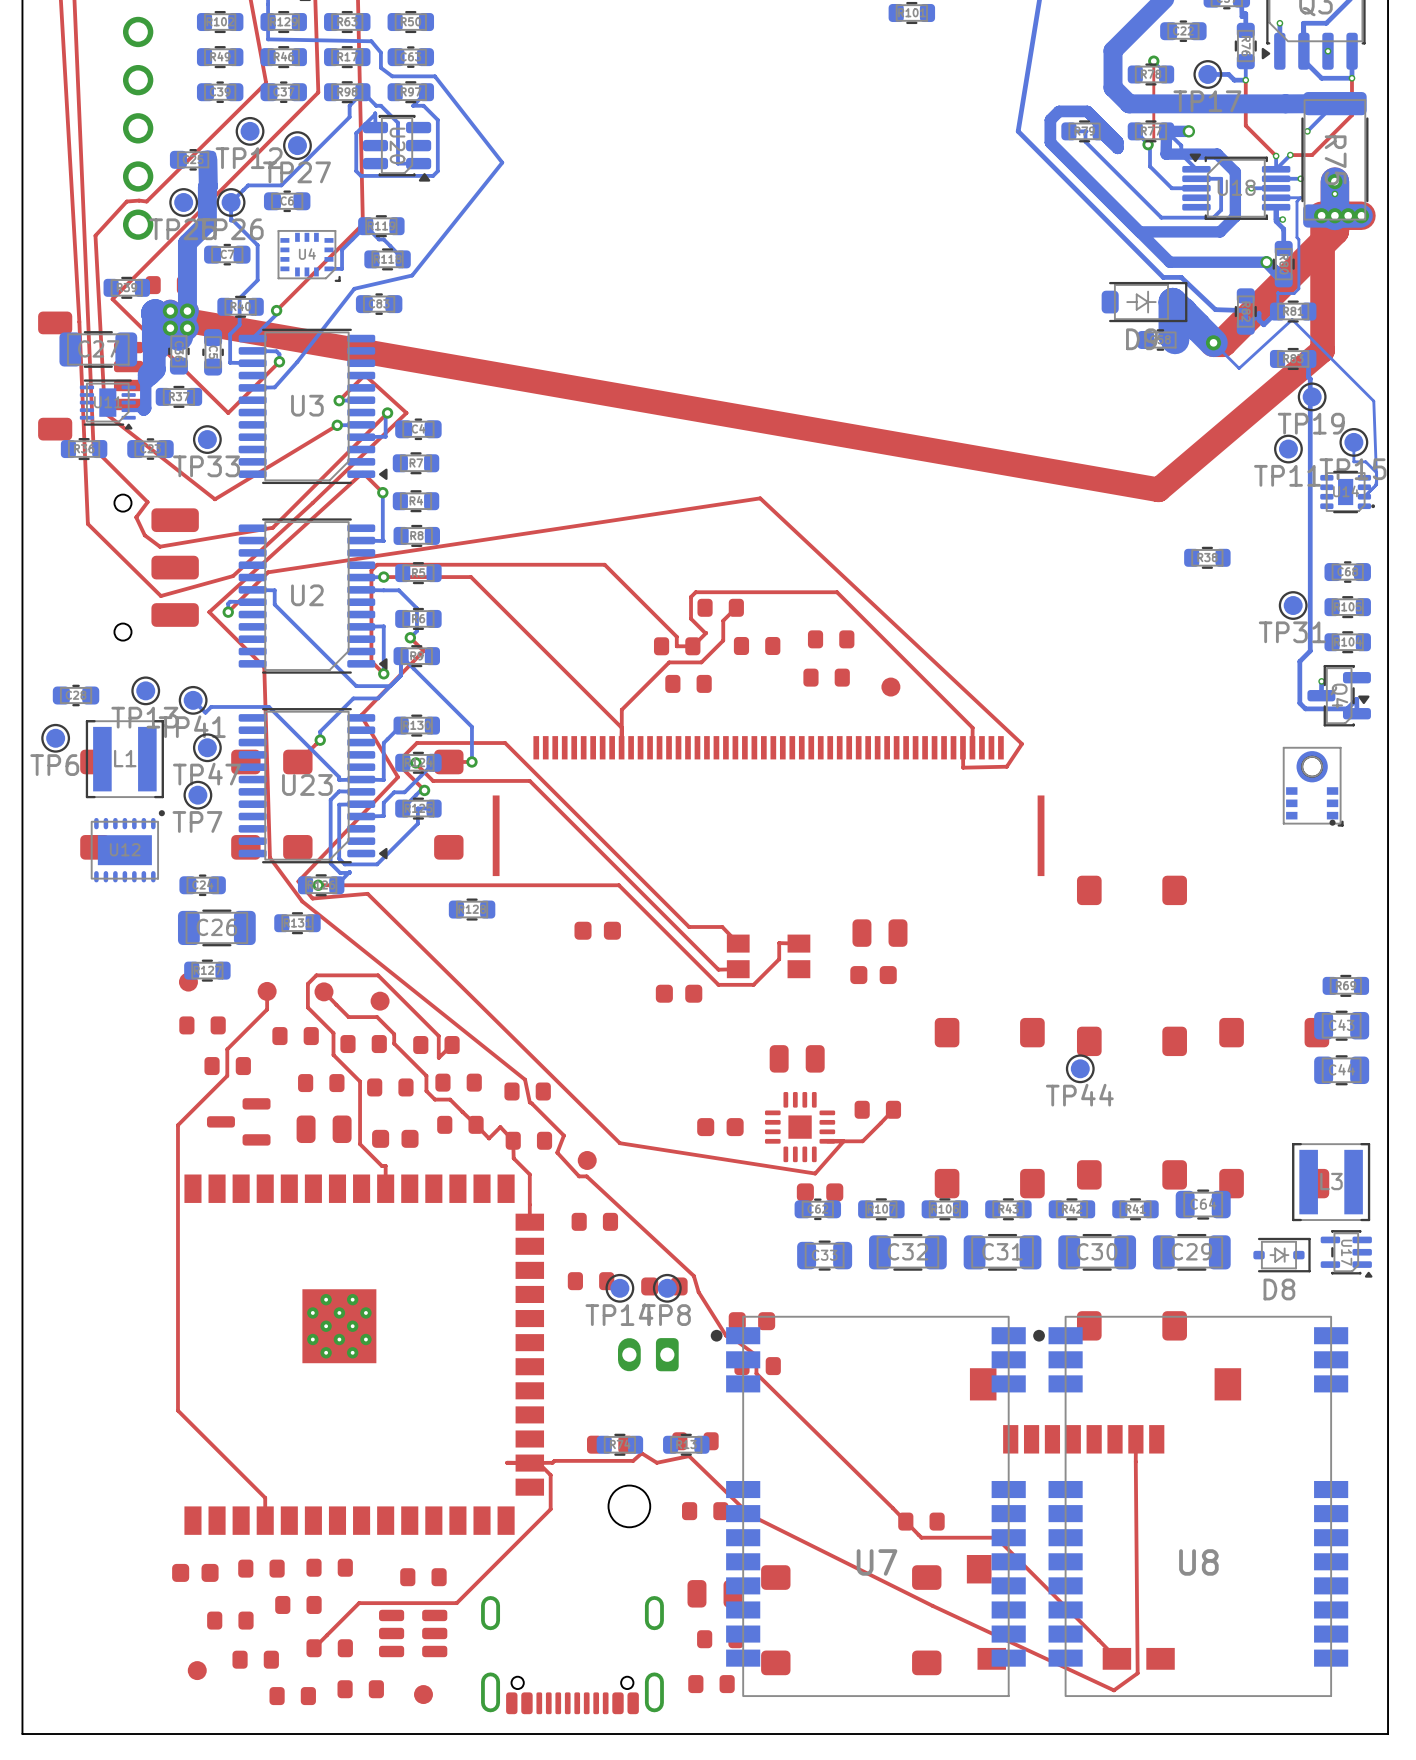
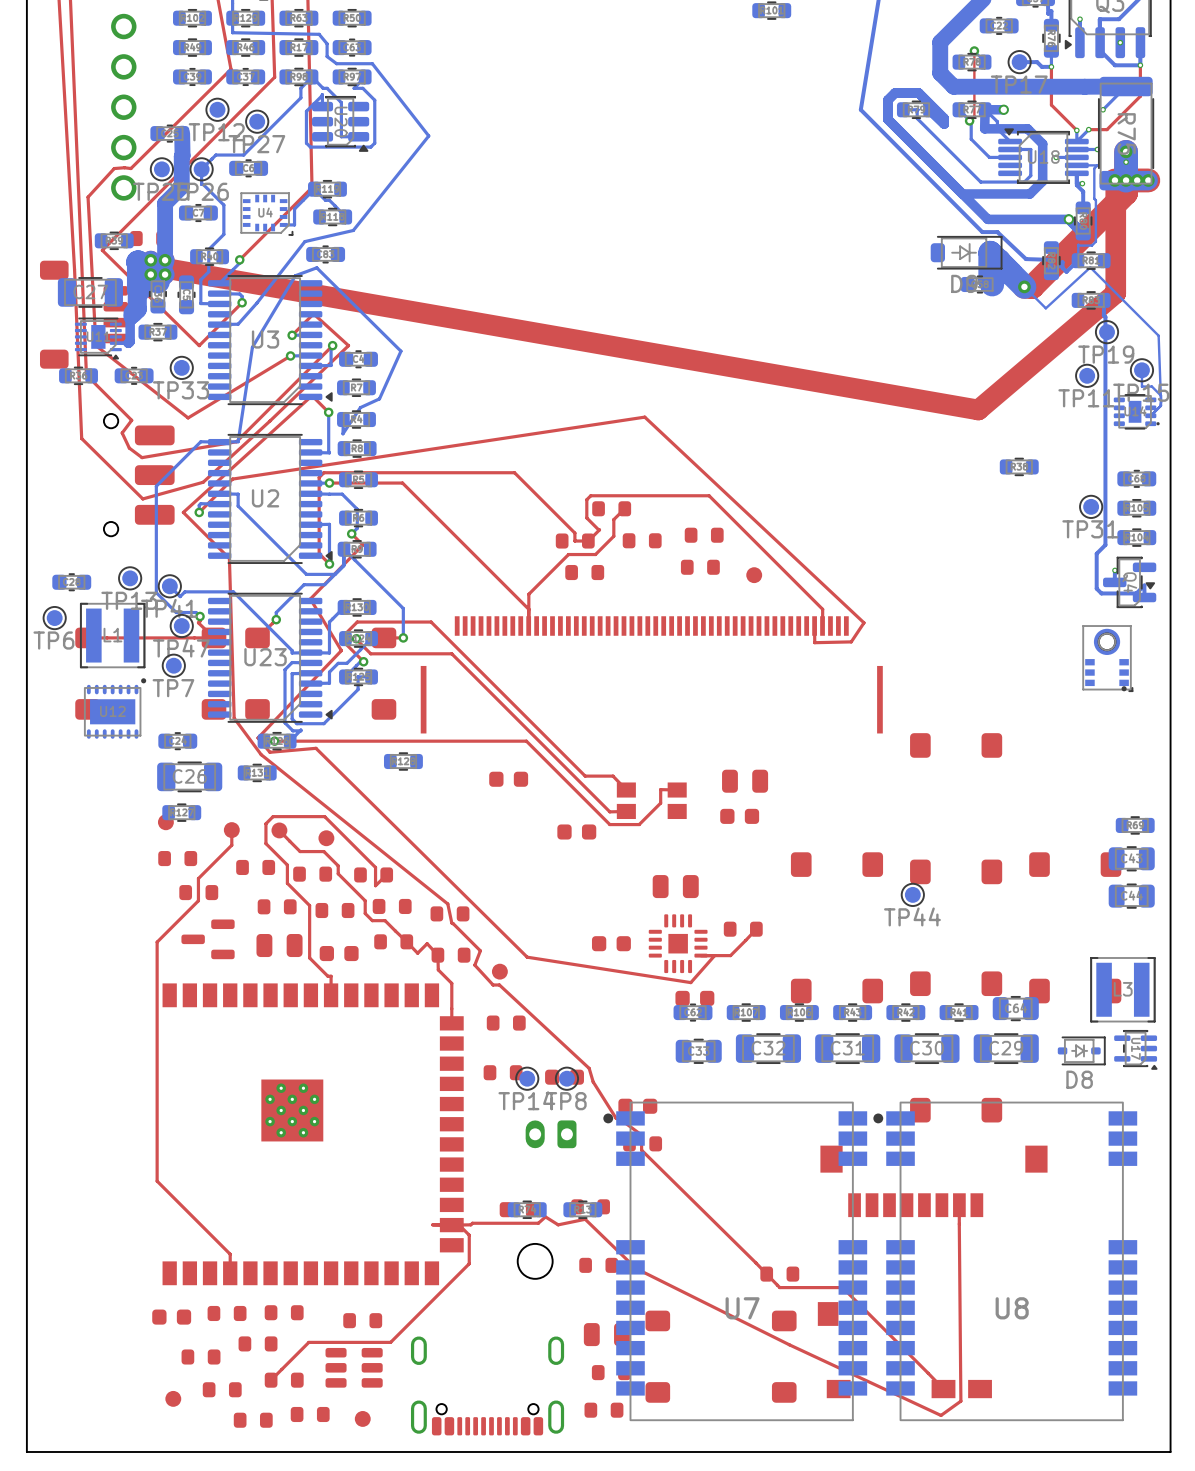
bottom track: none -> (343, 419) (342, 433) (360, 407) (379, 398) (400, 351) (316, 267) (295, 275) (252, 347) (238, 441) (200, 441) (156, 486) (156, 592) (176, 612) (196, 612) (200, 616)
top track: none -> (200, 616) (198, 622) (214, 637) (87, 637)
via: none -> (200, 616)

